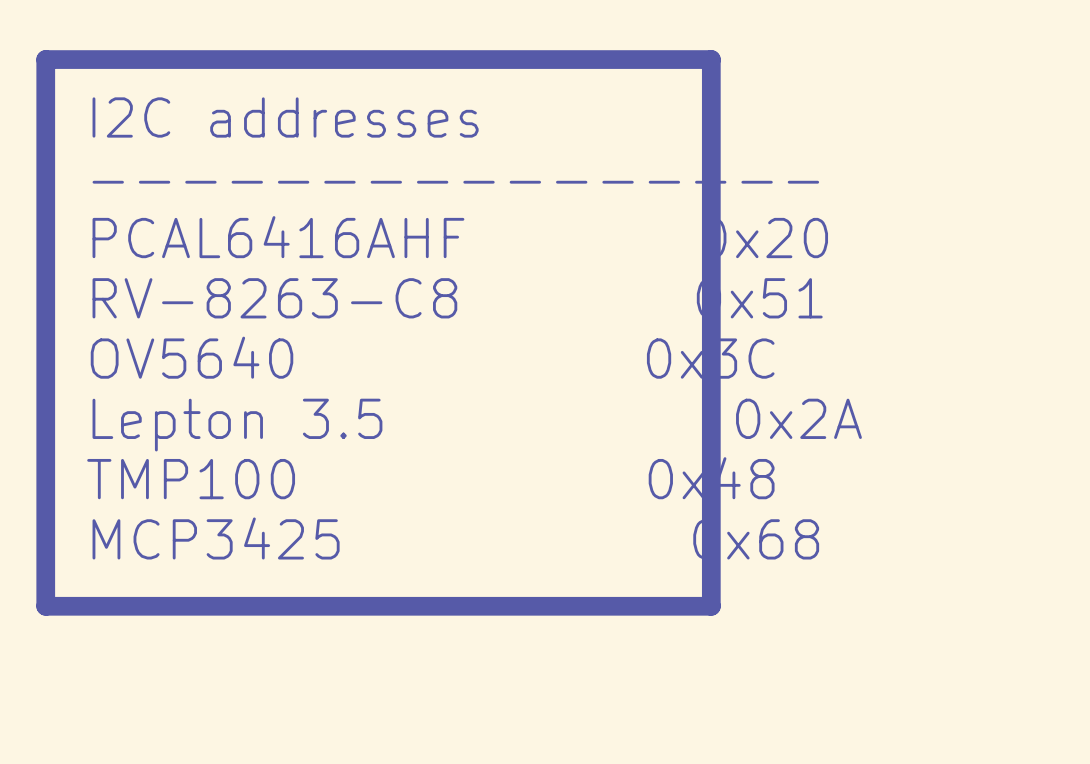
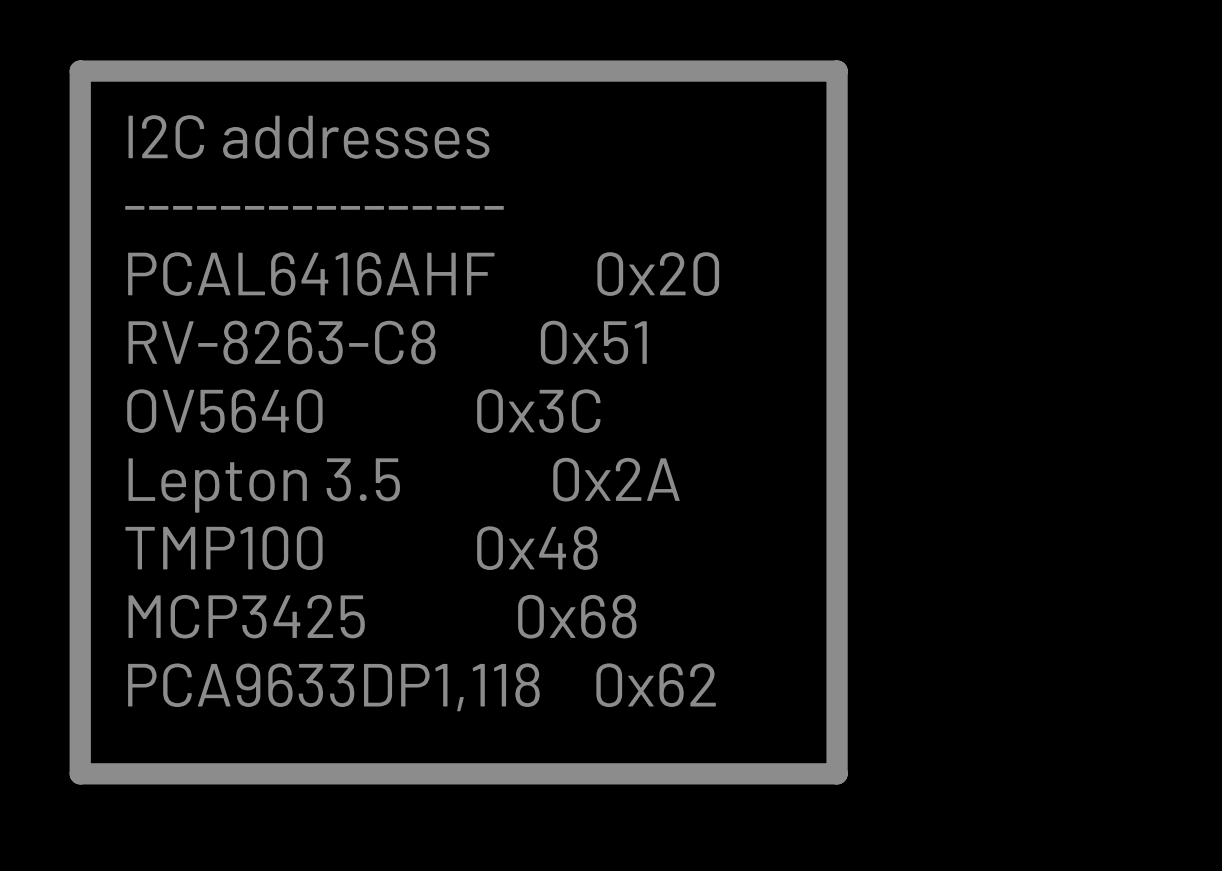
text: none -> PCA9633DP1,118 0x62 (421, 687)
line: (45, 606) (711, 606) -> (80, 692) (80, 773) (837, 773) (837, 692)

